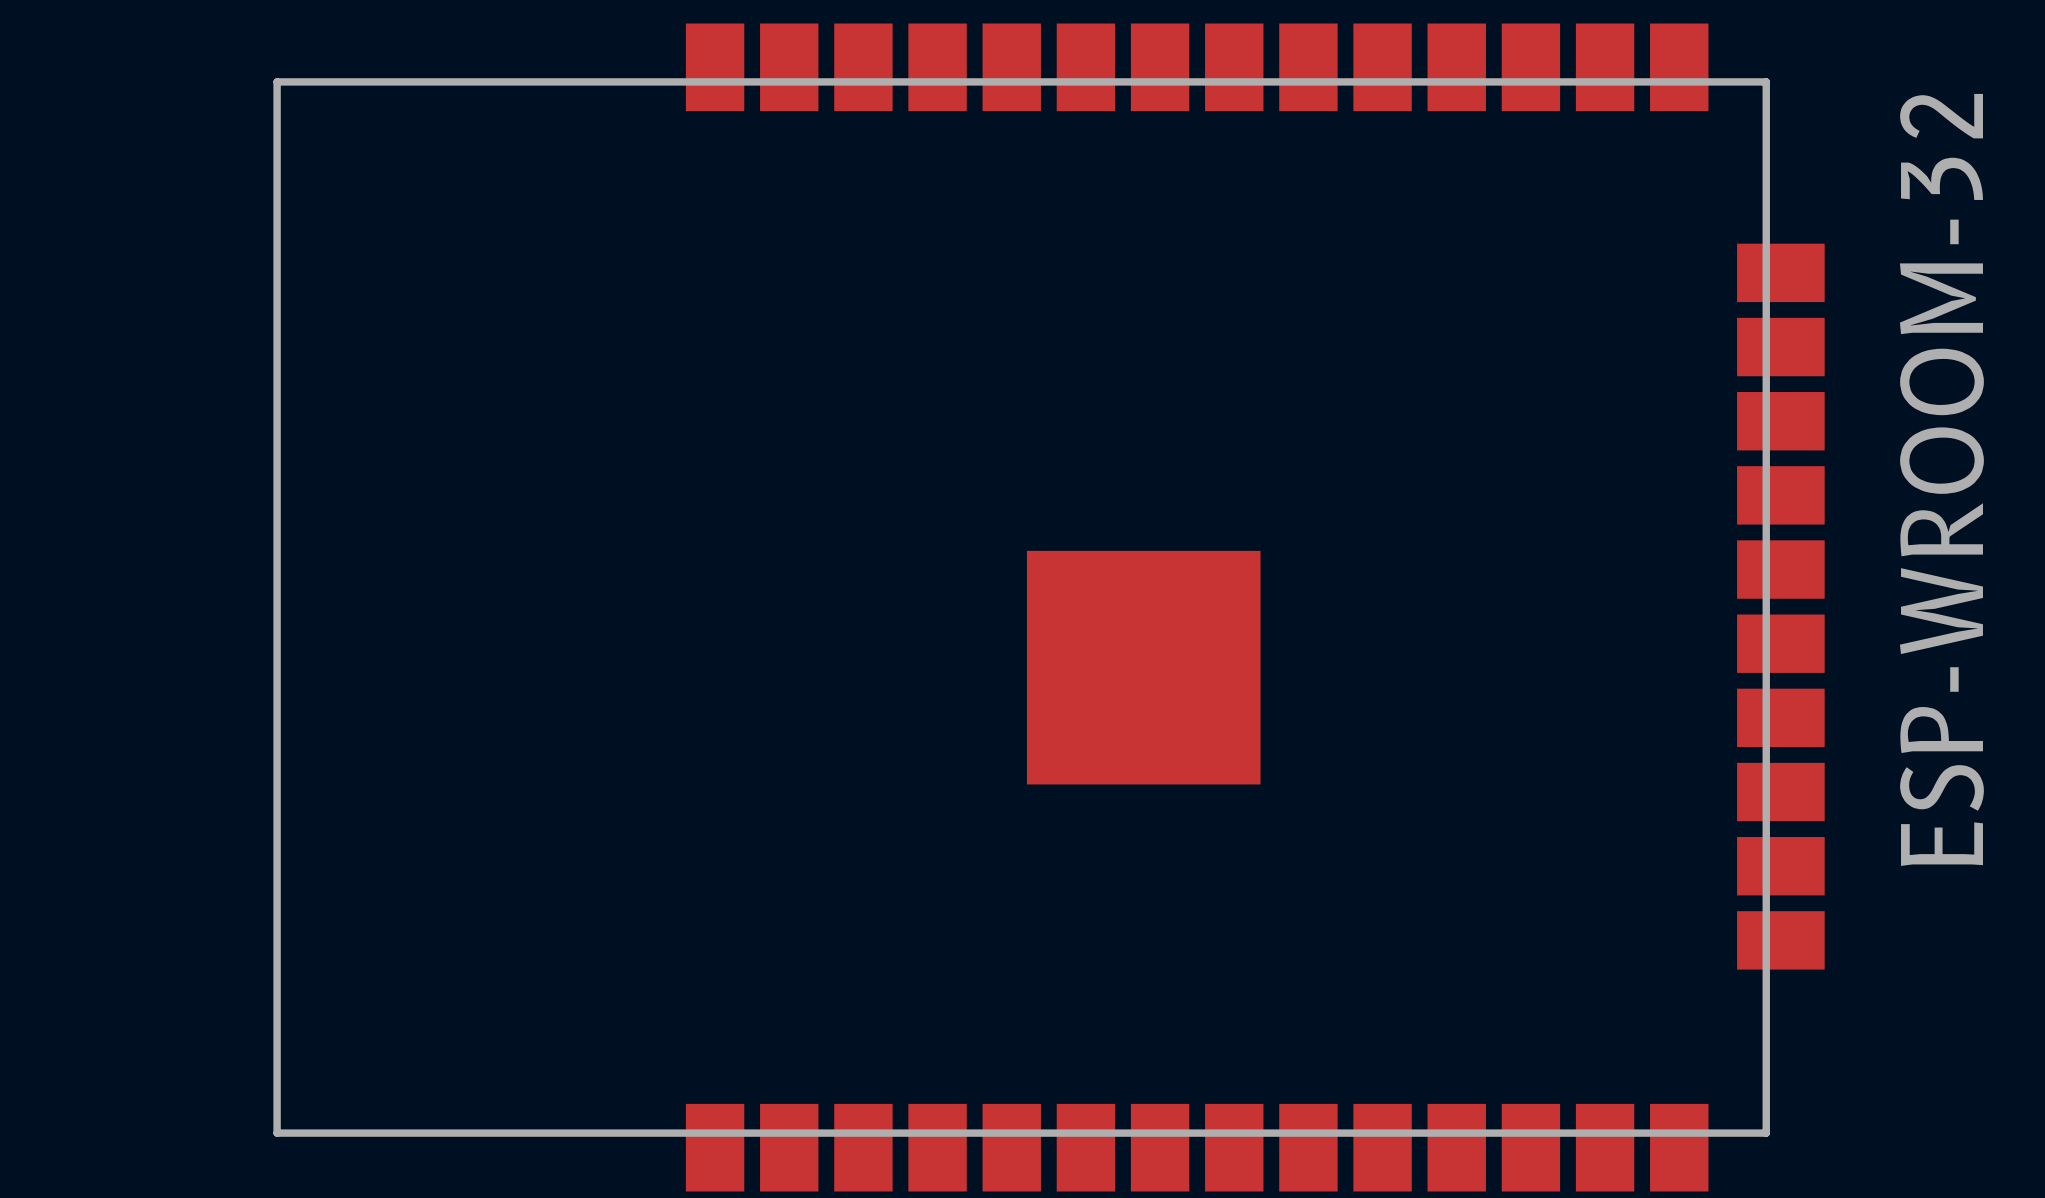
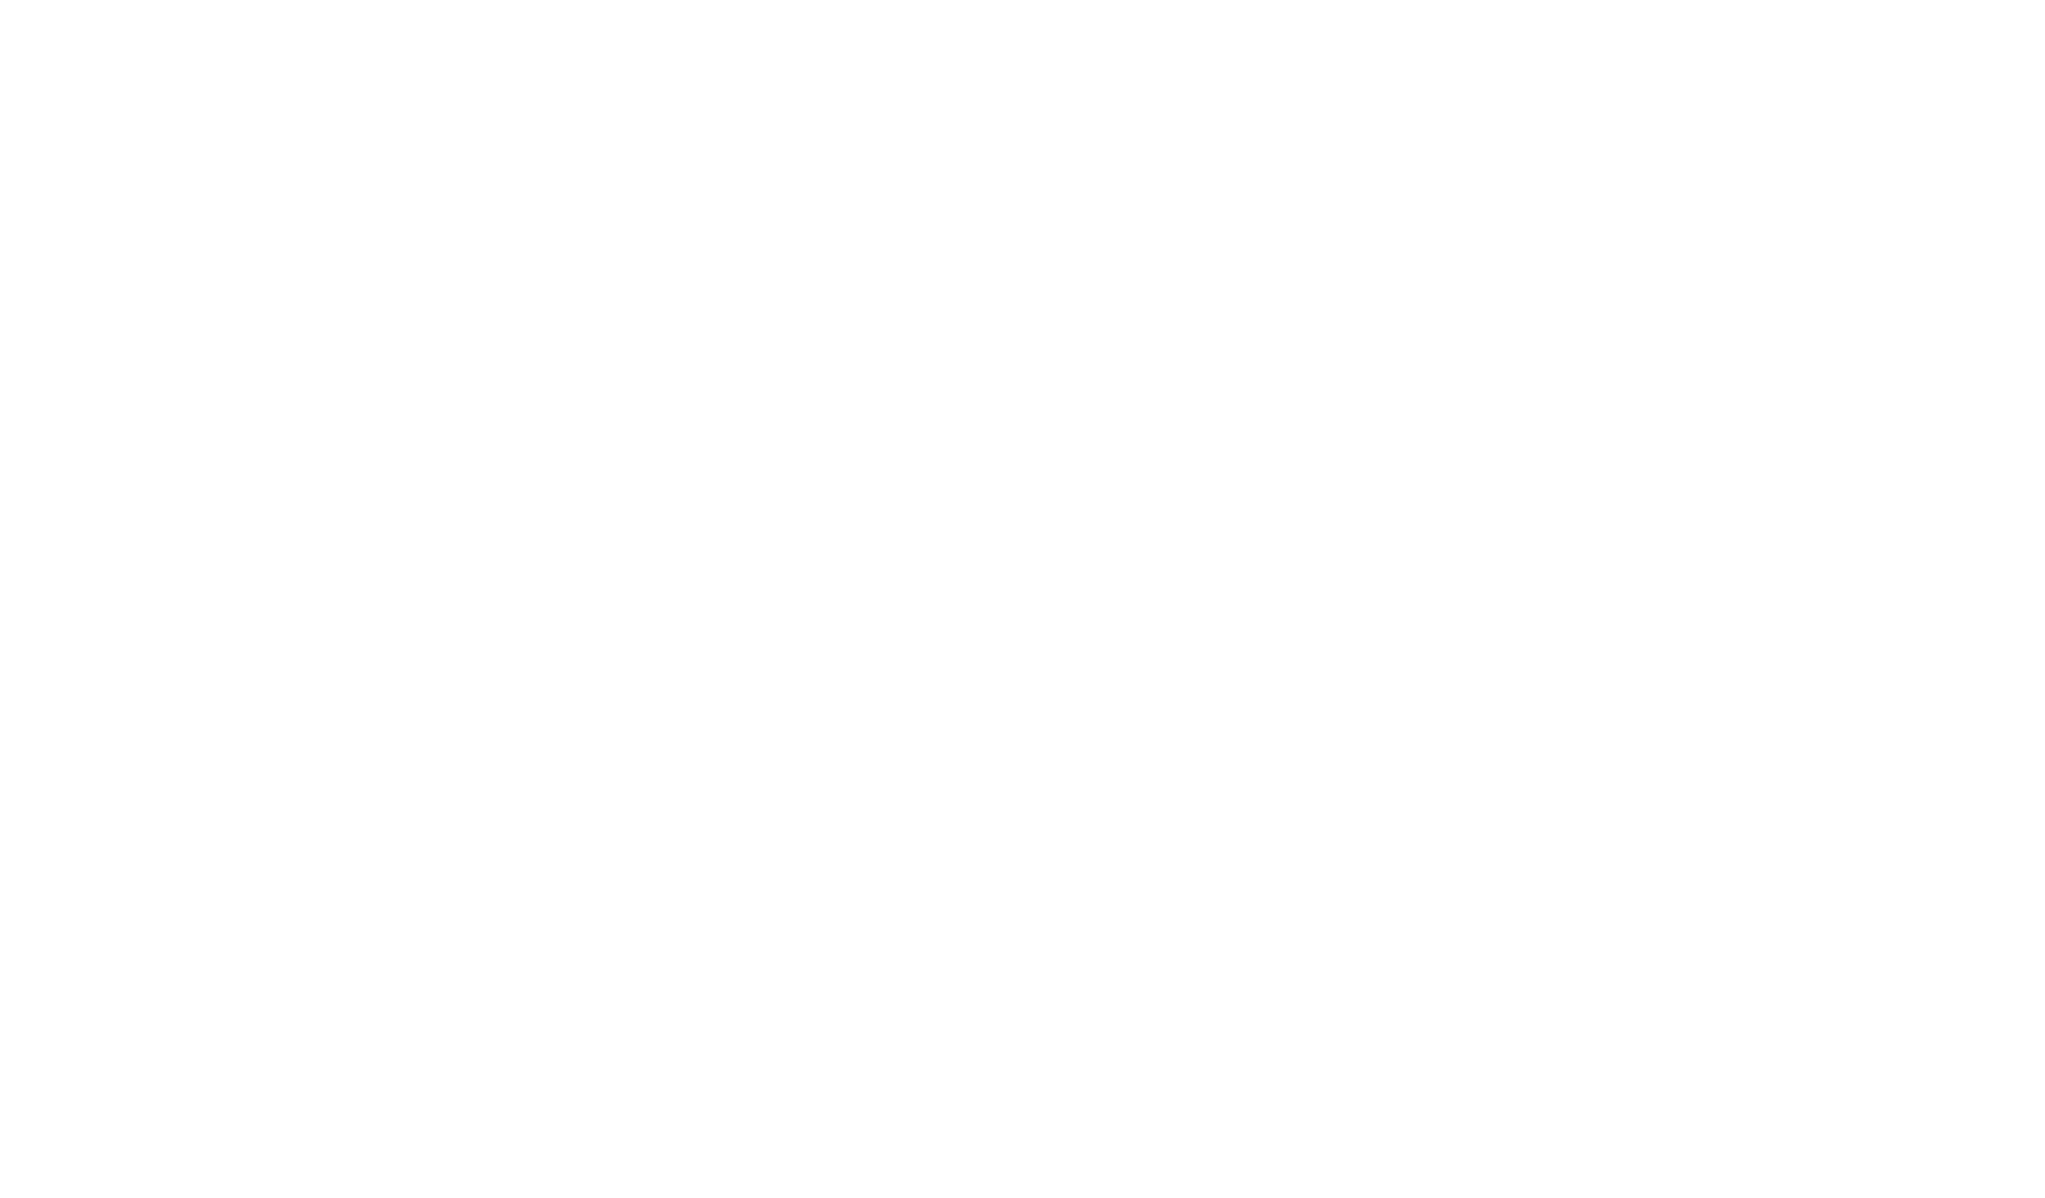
part: ESP-WROOM-32 (1049, 607) -> none

